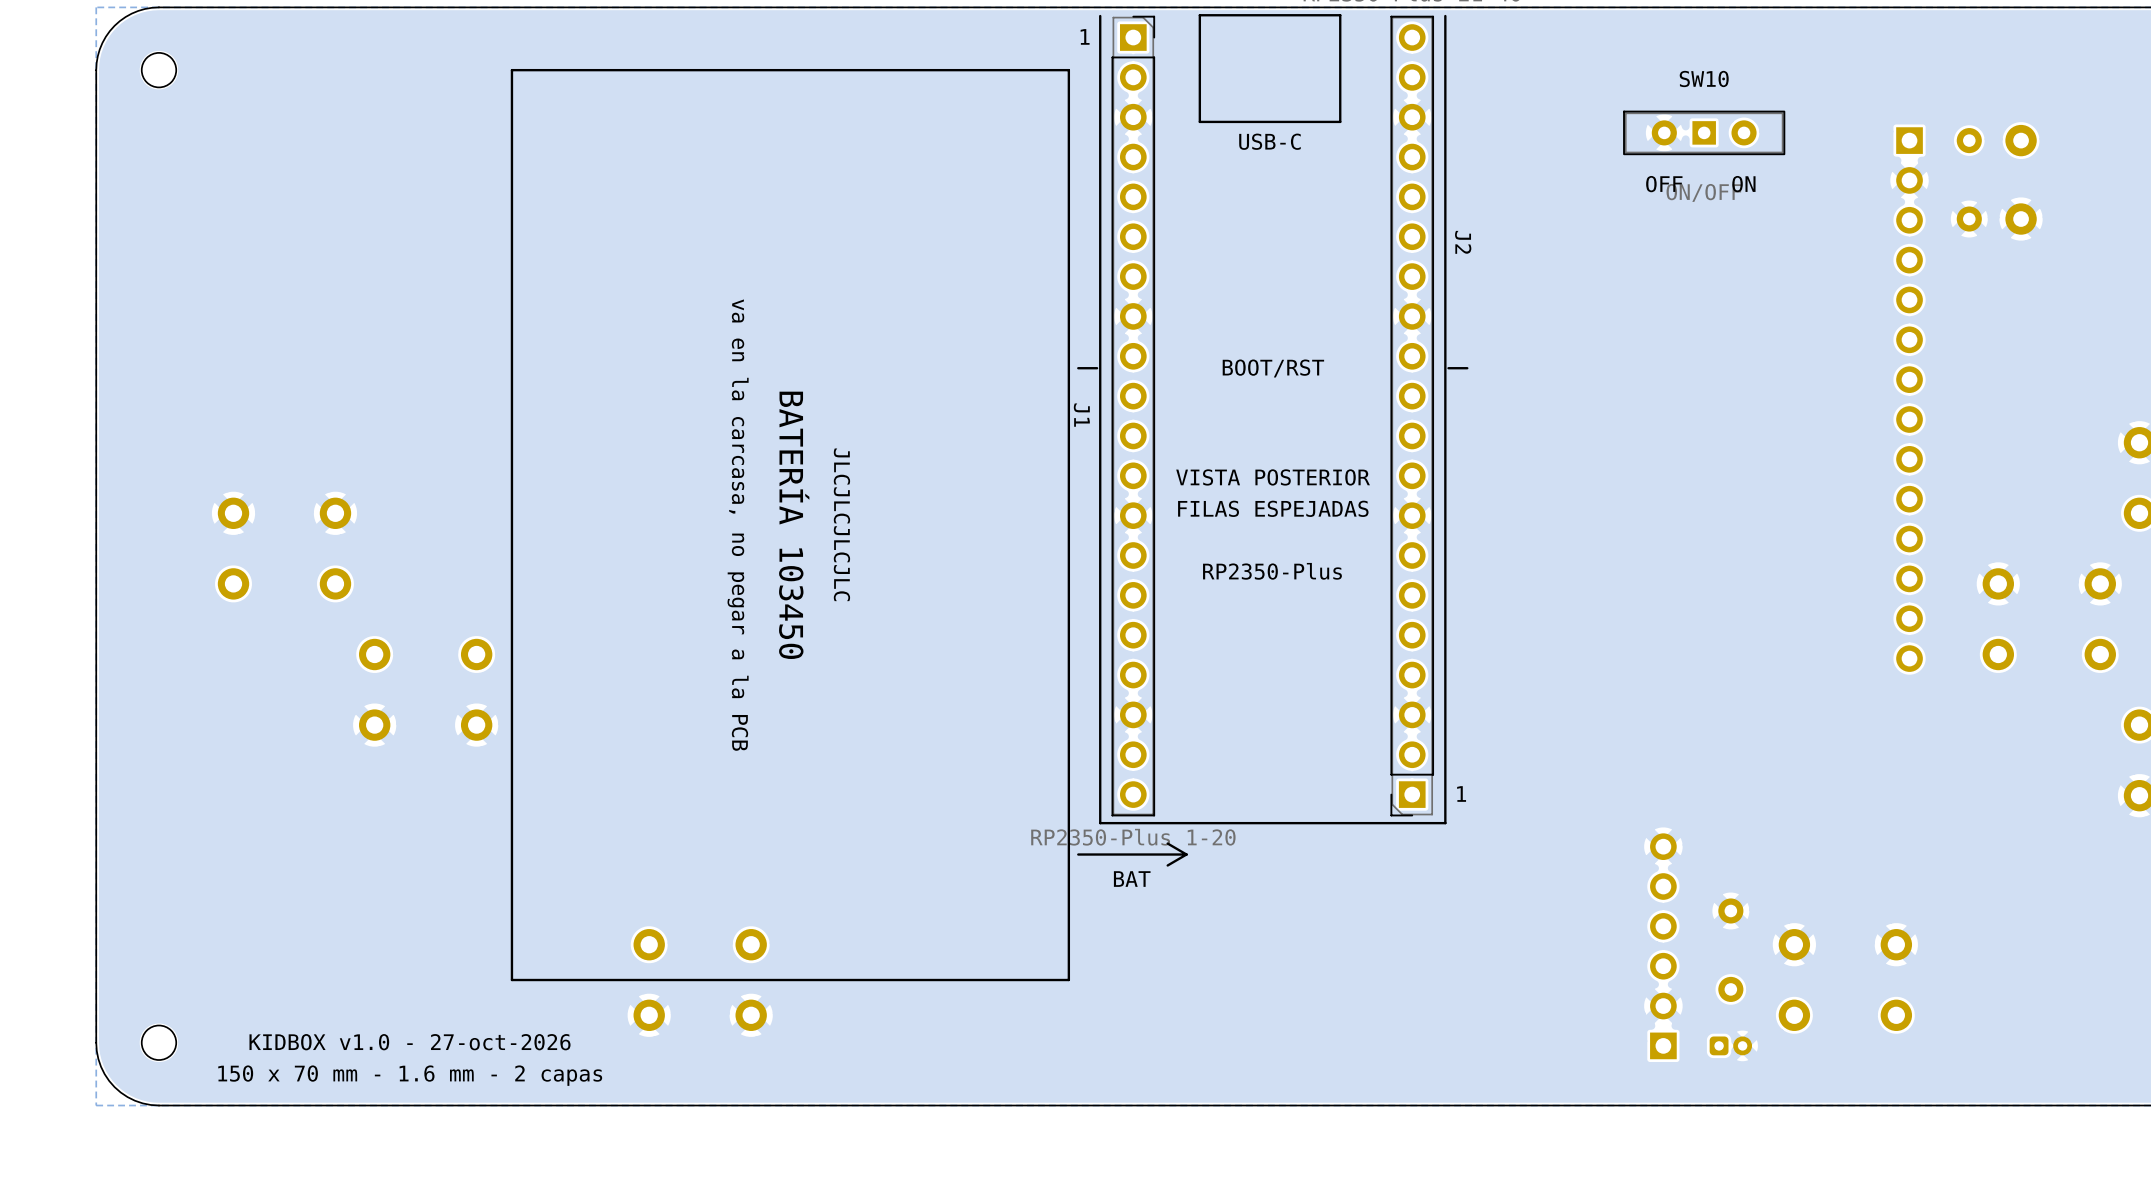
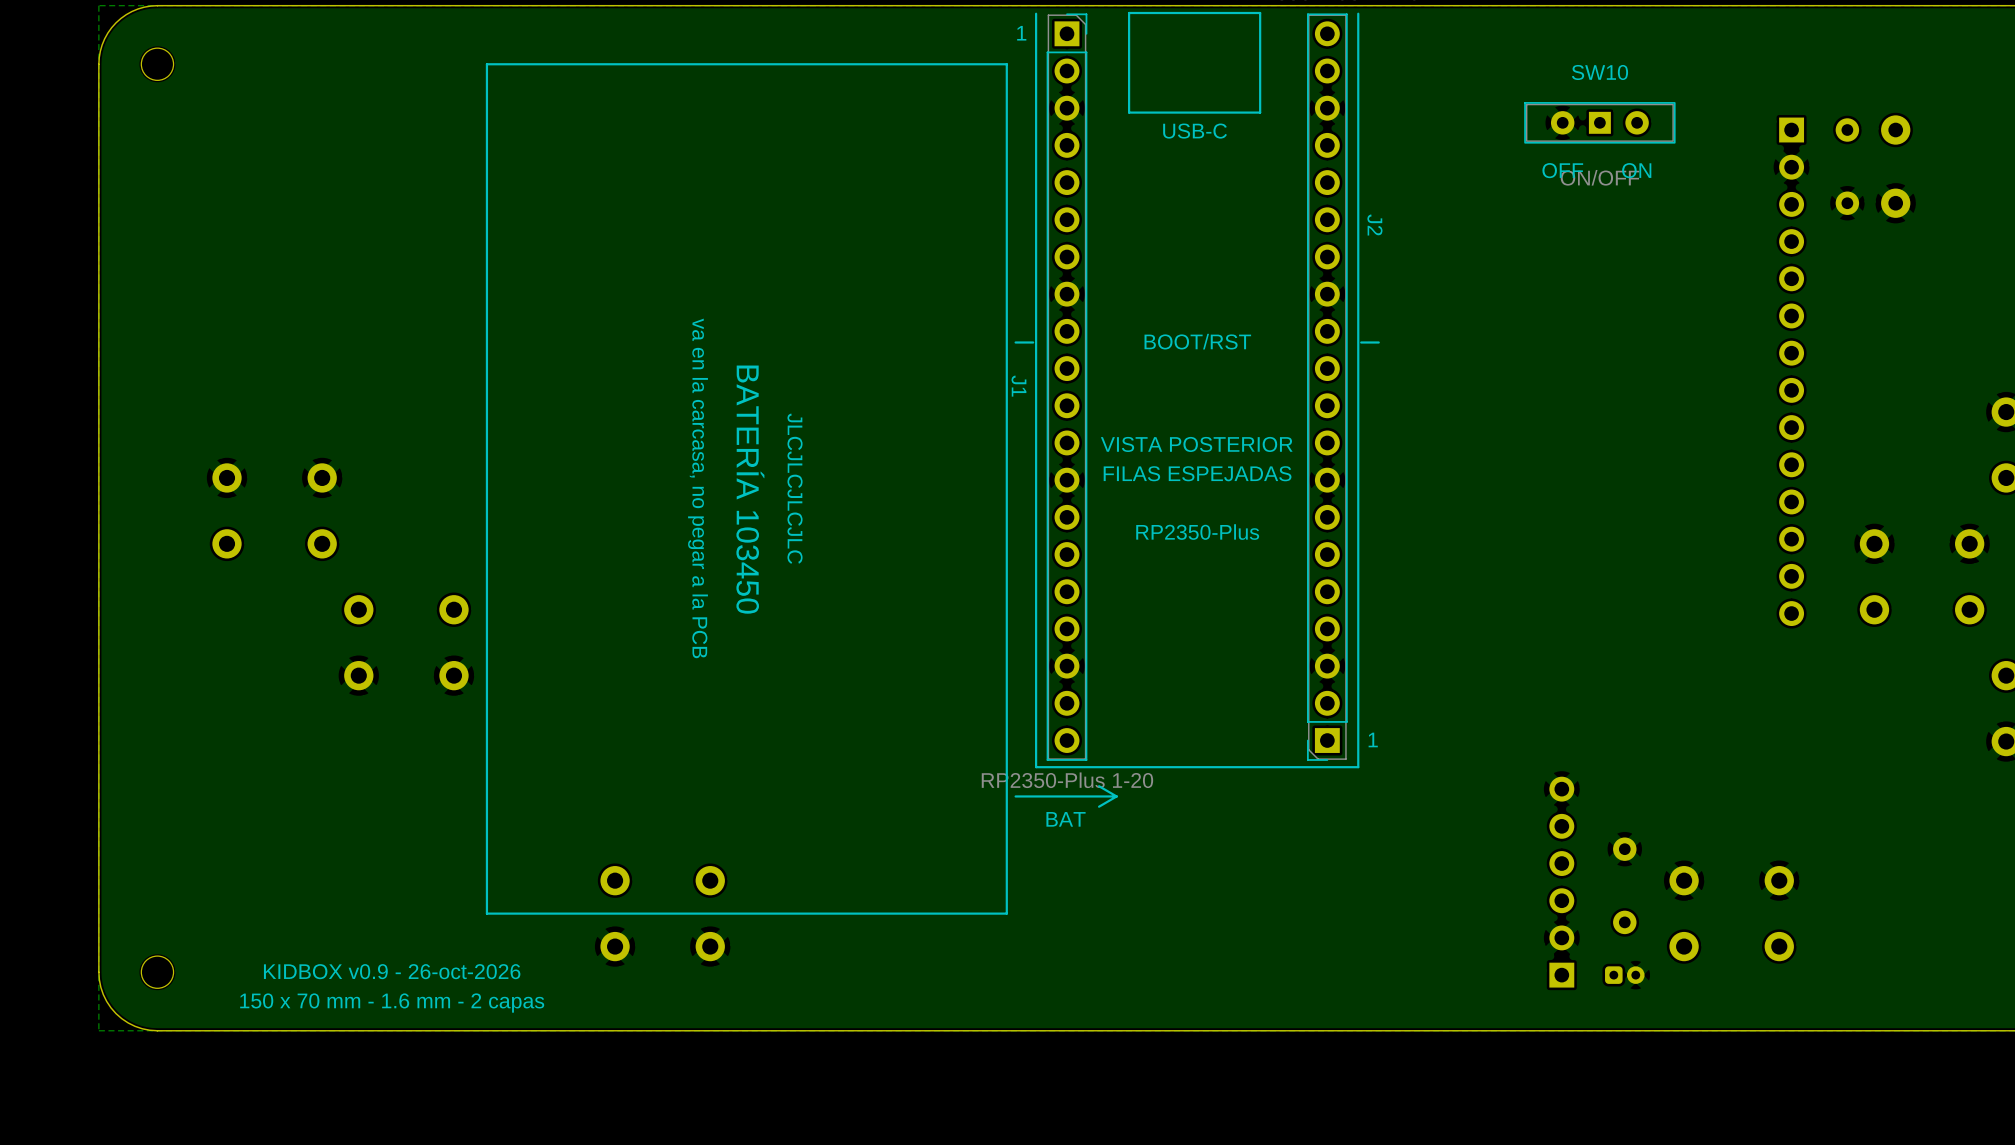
text: KIDBOX v1.0 - 27-oct-2026 (410, 1042) -> KIDBOX v0.9 - 26-oct-2026 (392, 971)

